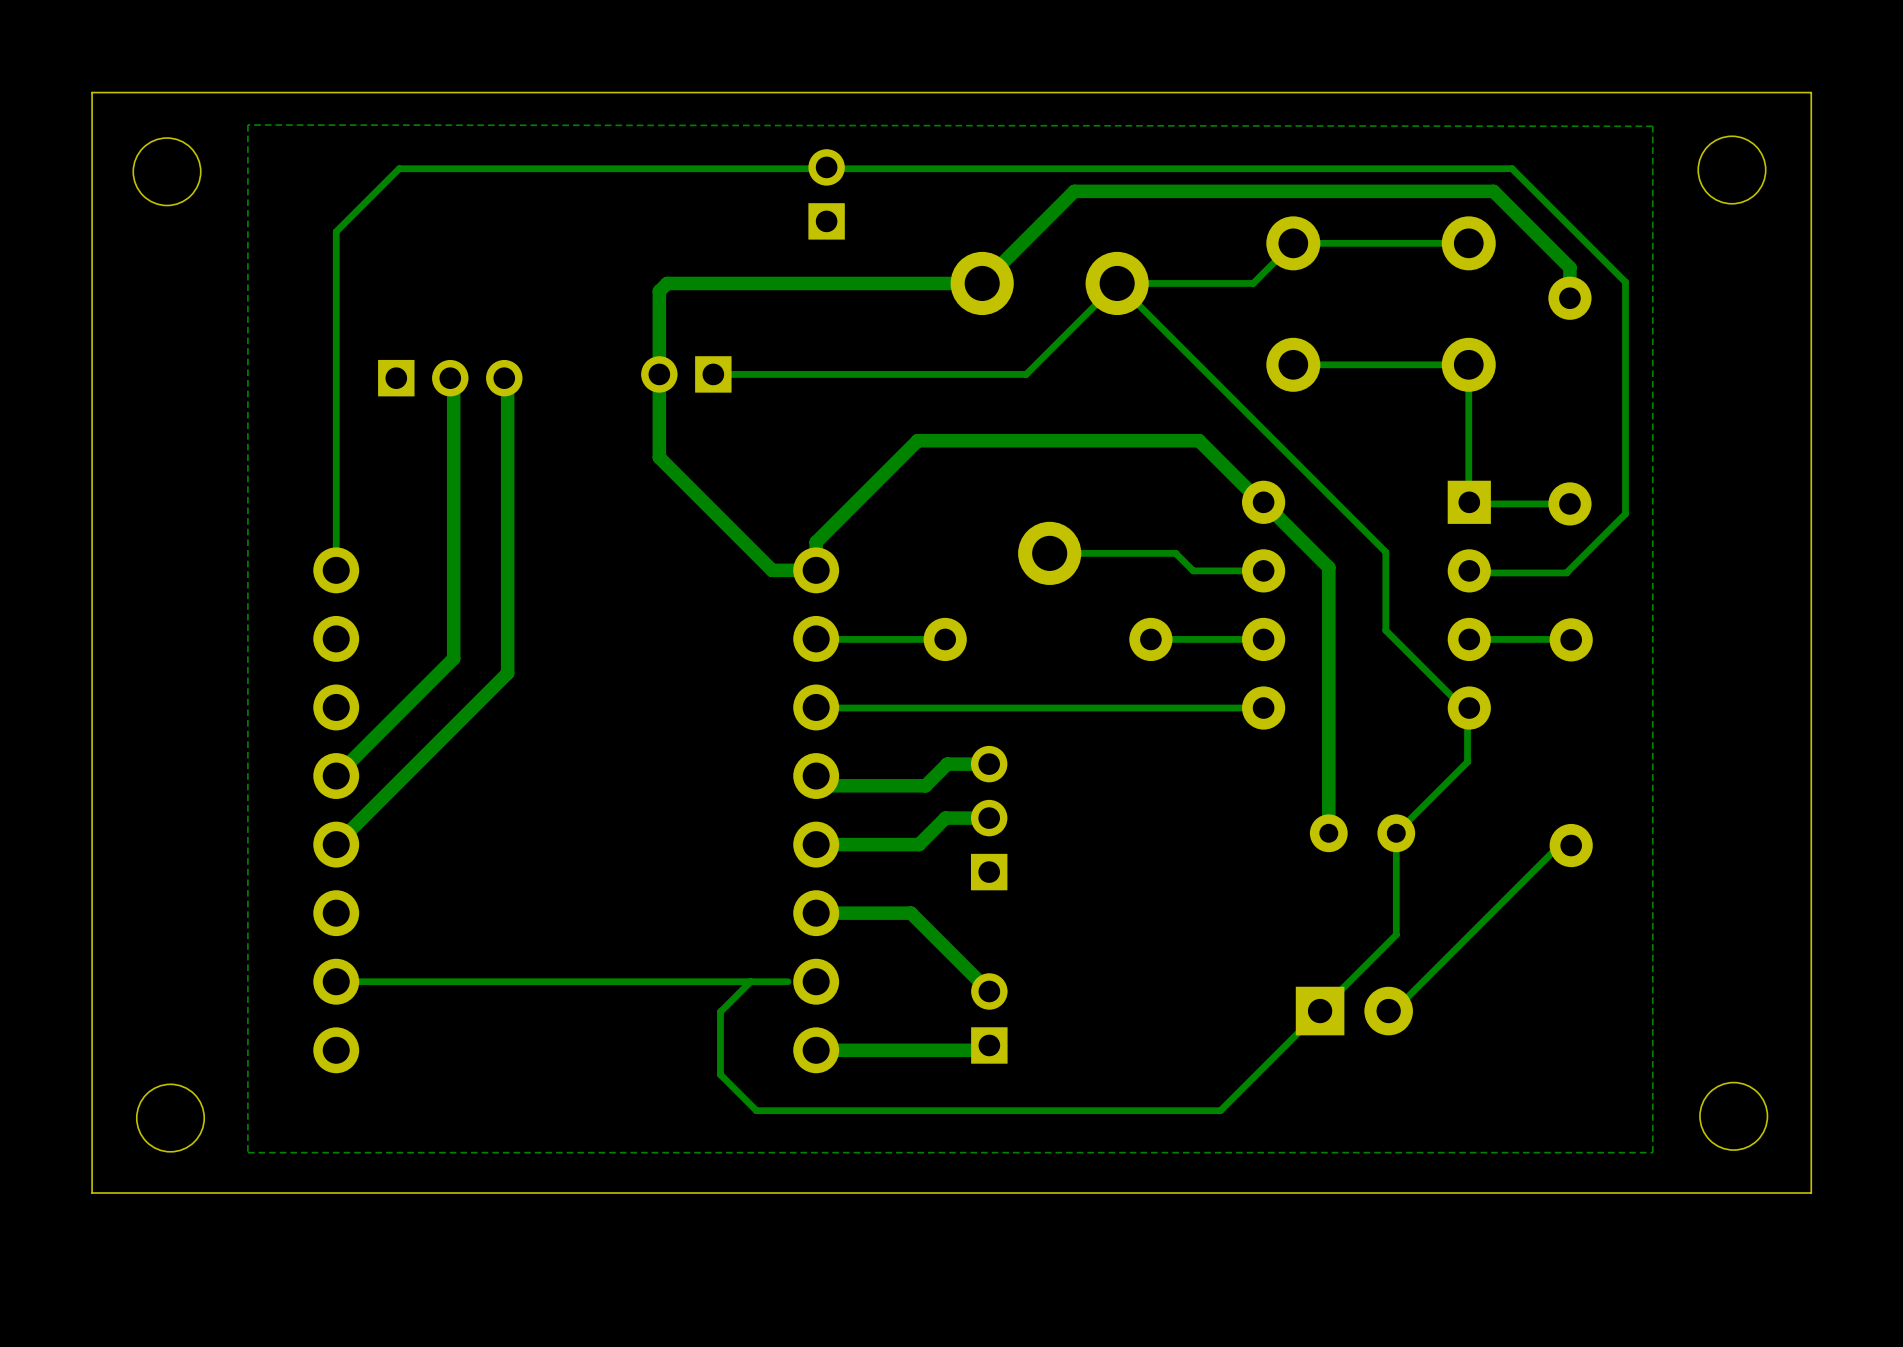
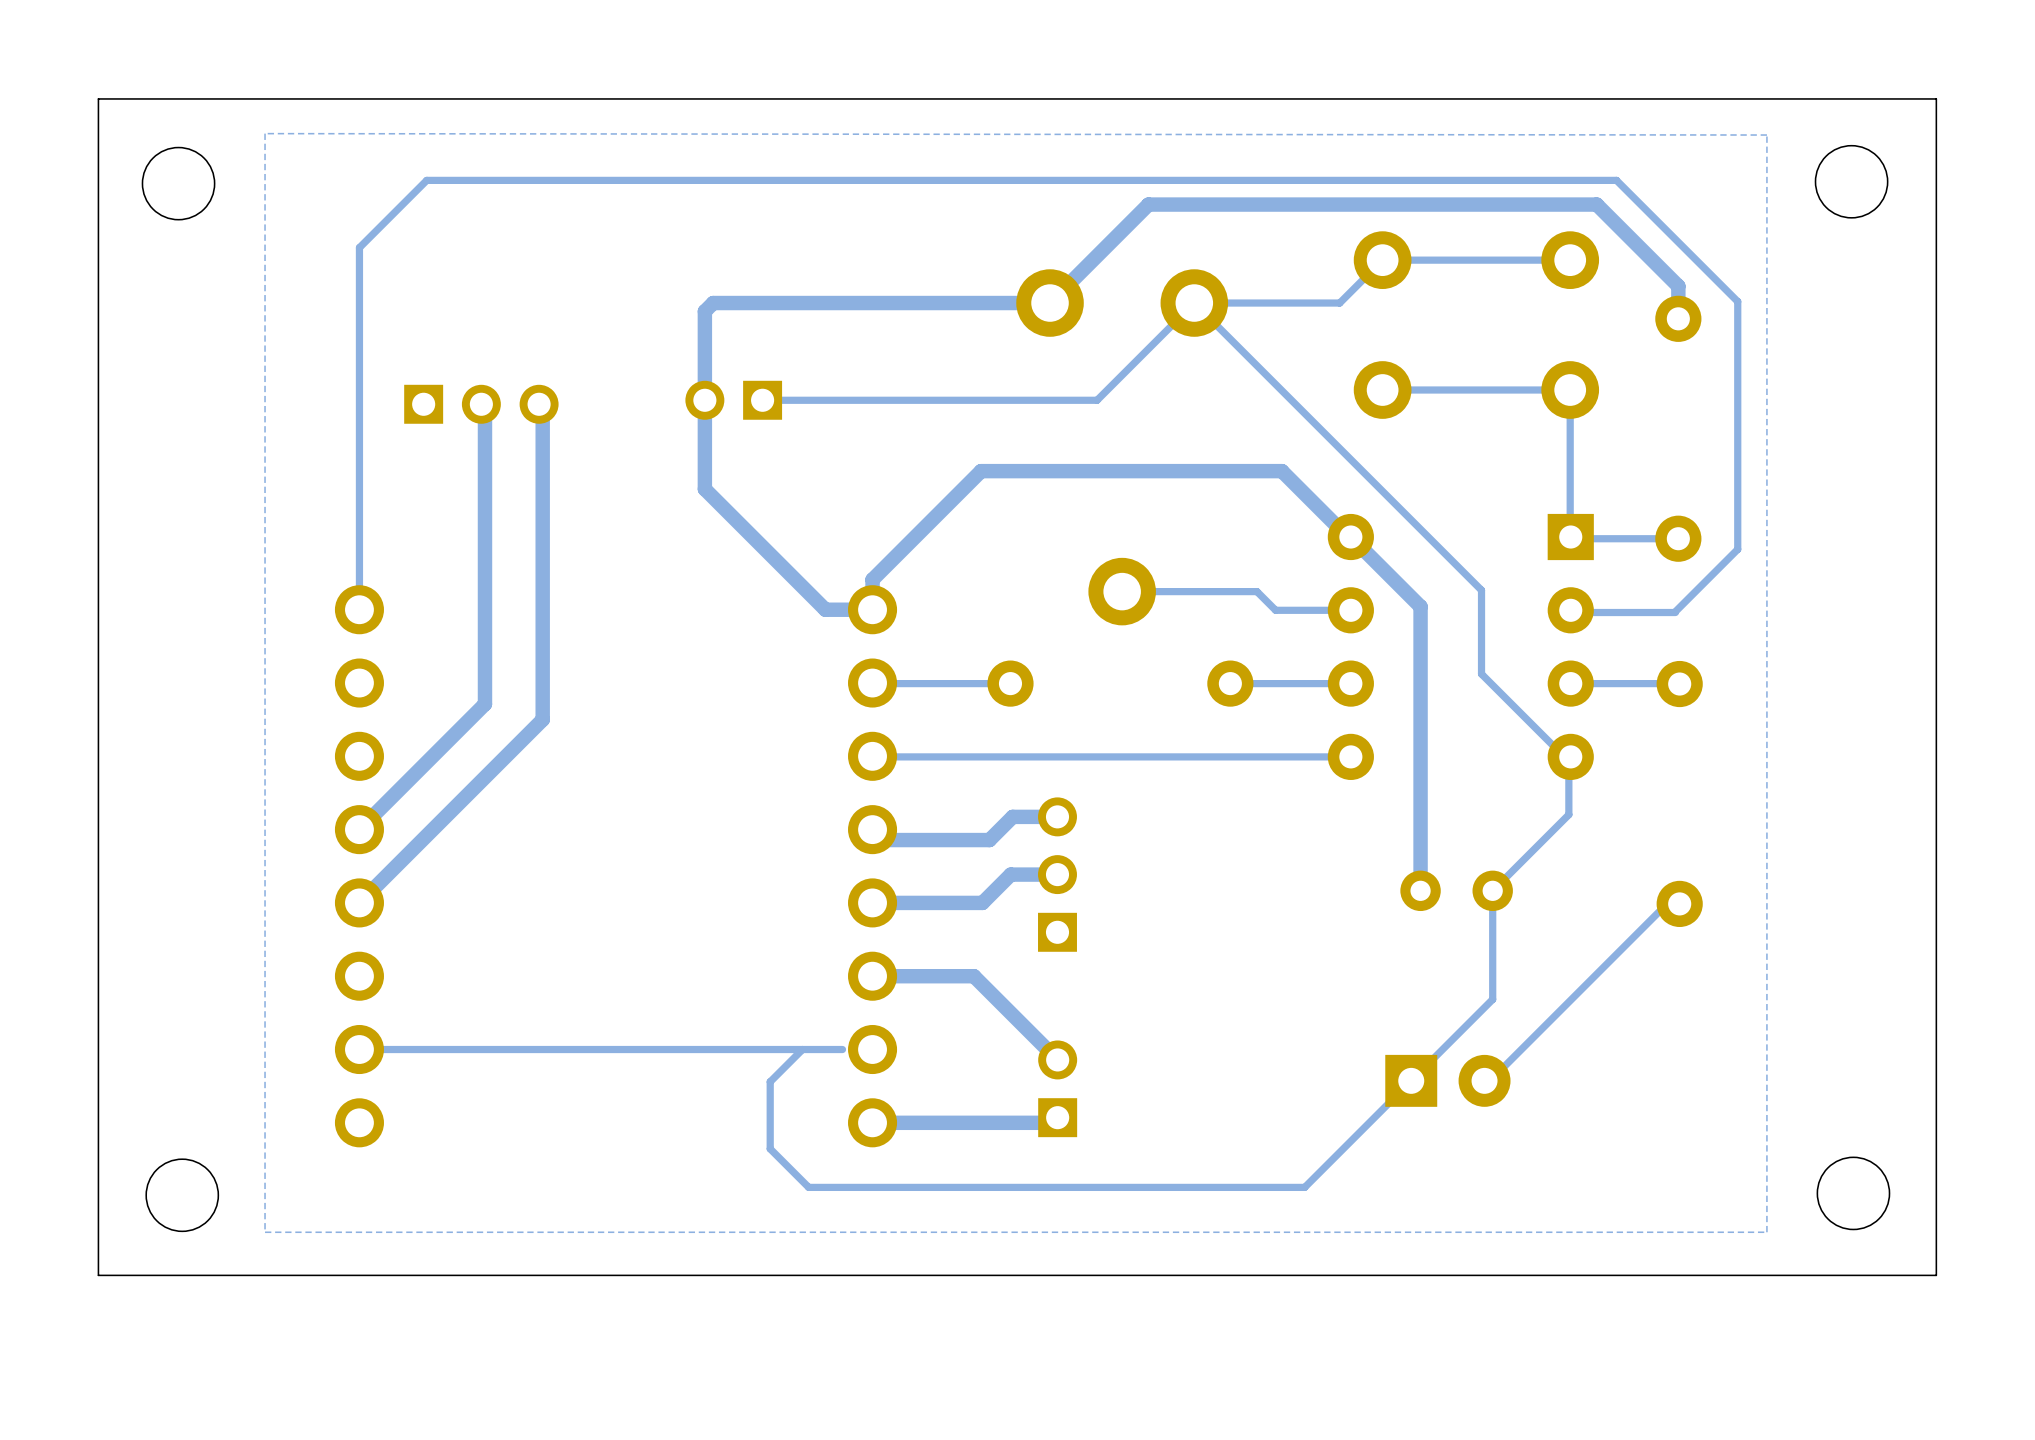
part: (826, 194) -> none

